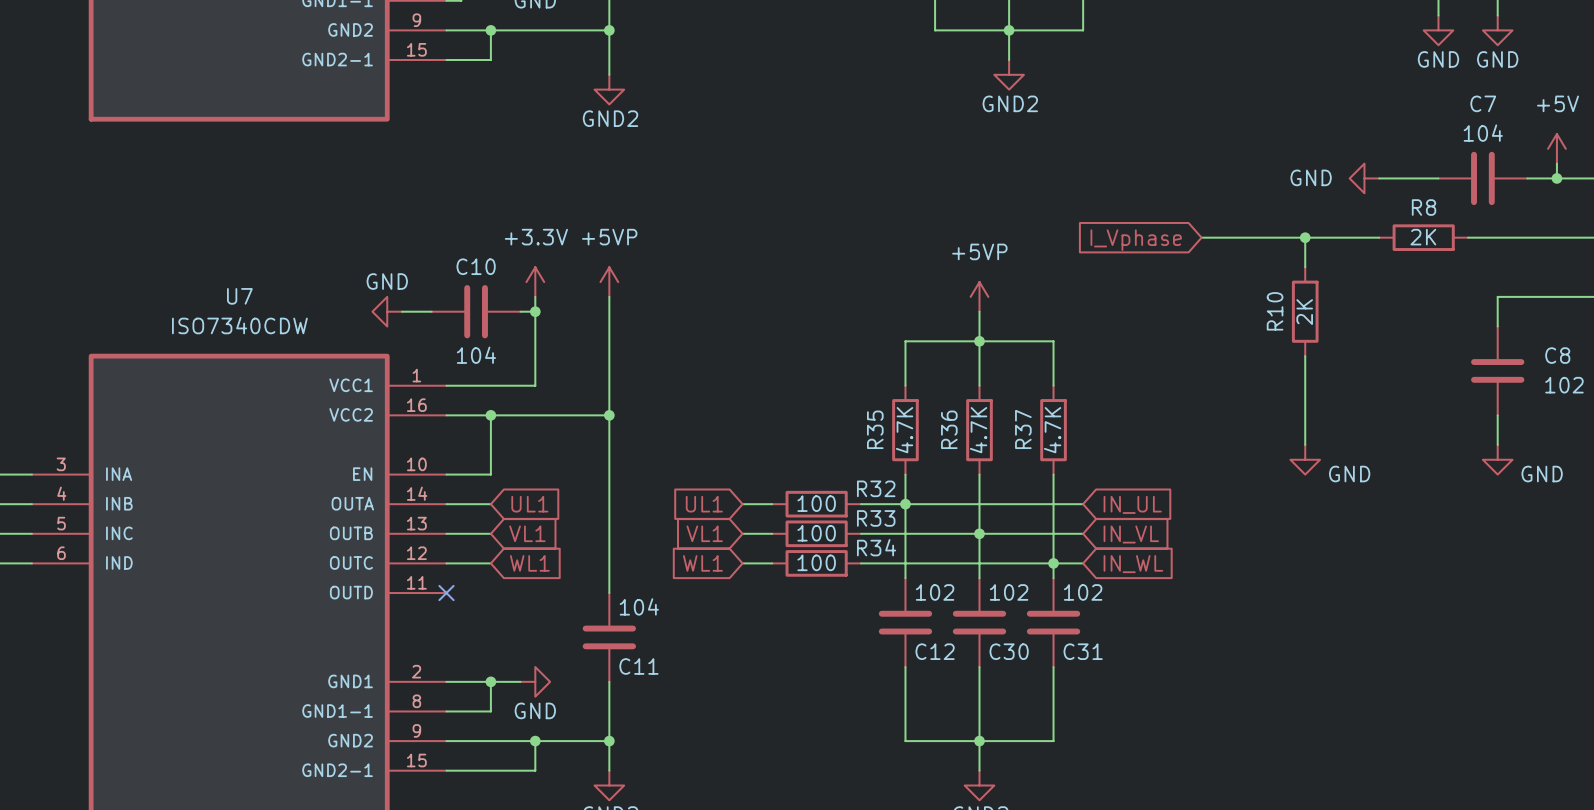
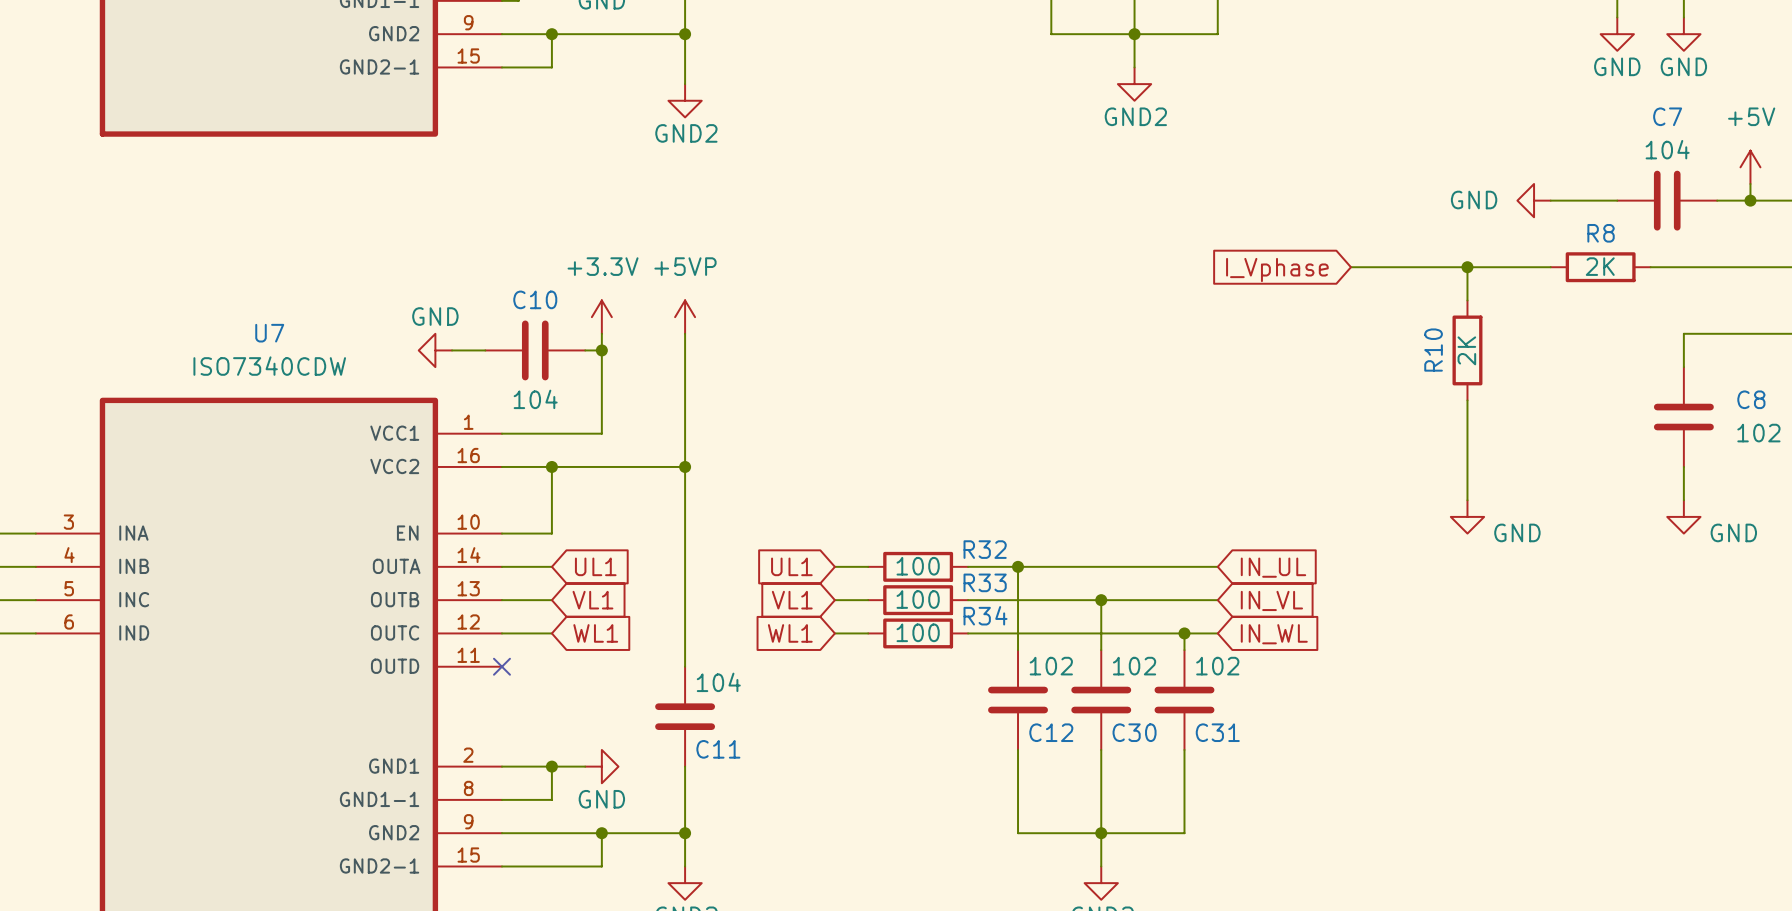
power symbol: +5VP (979, 296) -> none
wire: (979, 311) (979, 385) -> none
junction: (979, 341) -> none
wire: (905, 385) (905, 341) (1053, 341) (1053, 385) -> none
R35: 4.7K (905, 430) -> none
R36: 4.7K (979, 430) -> none
R37: 4.7K (1053, 430) -> none
wire: (905, 474) (905, 504) -> none
wire: (979, 474) (979, 533) -> none
wire: (1053, 474) (1053, 563) -> none

